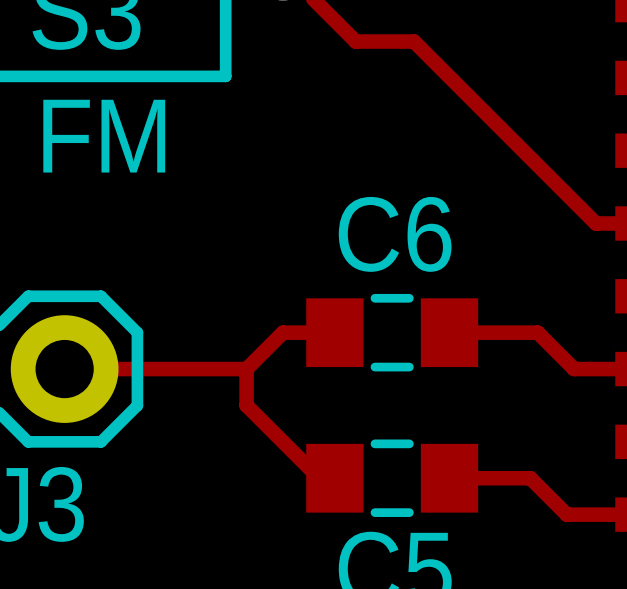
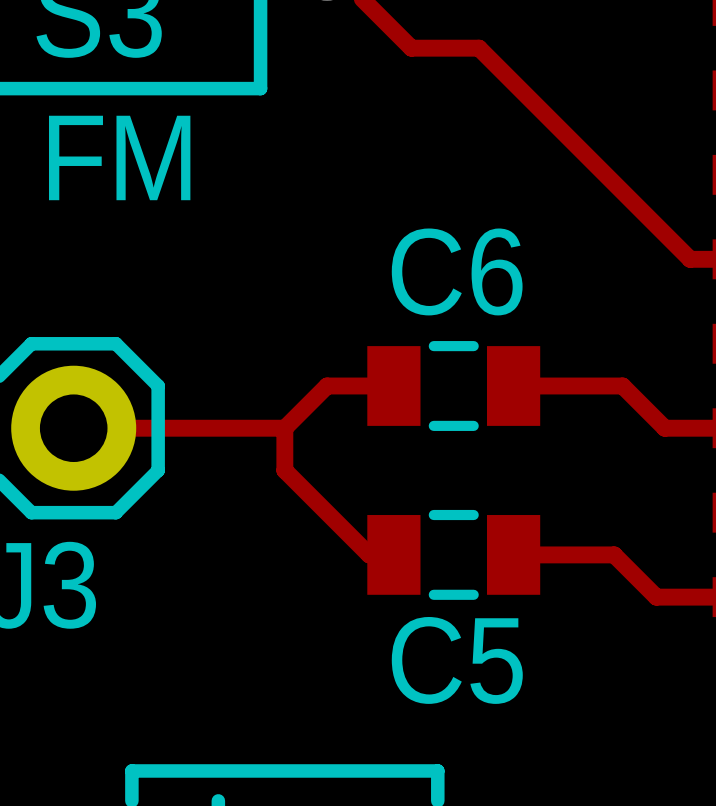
C6 footprint: [306, 293, 479, 372] -> [367, 341, 541, 431]
C5 footprint: [306, 439, 479, 517] -> [367, 509, 541, 600]

